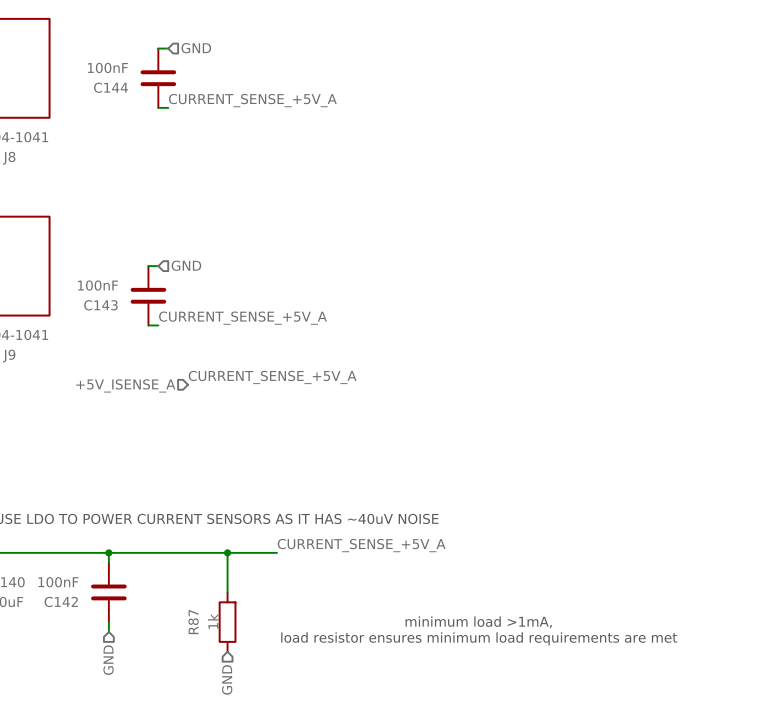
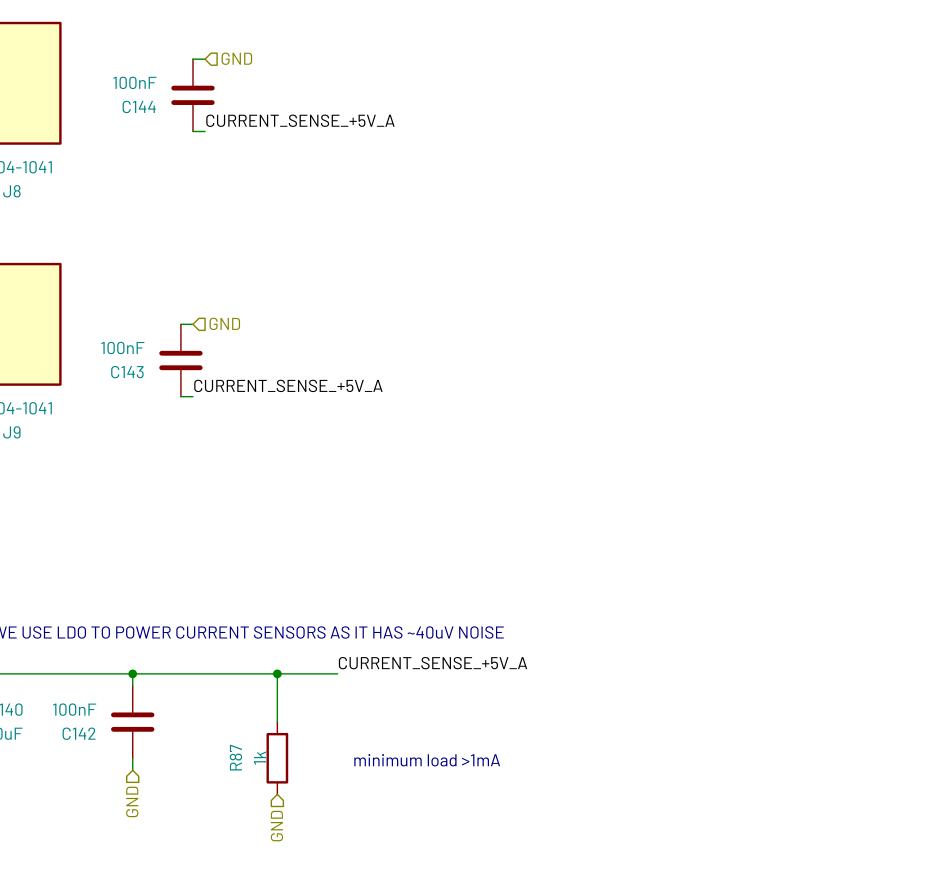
label: CURRENT_SENSE_+5V_A (272, 377) -> none
hierarchical label: +5V_ISENSE_A (125, 385) -> none
text: minimum load >1mA, (478, 622) -> minimum load >1mA (427, 760)
text: load resistor ensures minimum load requirements are met (479, 638) -> none

